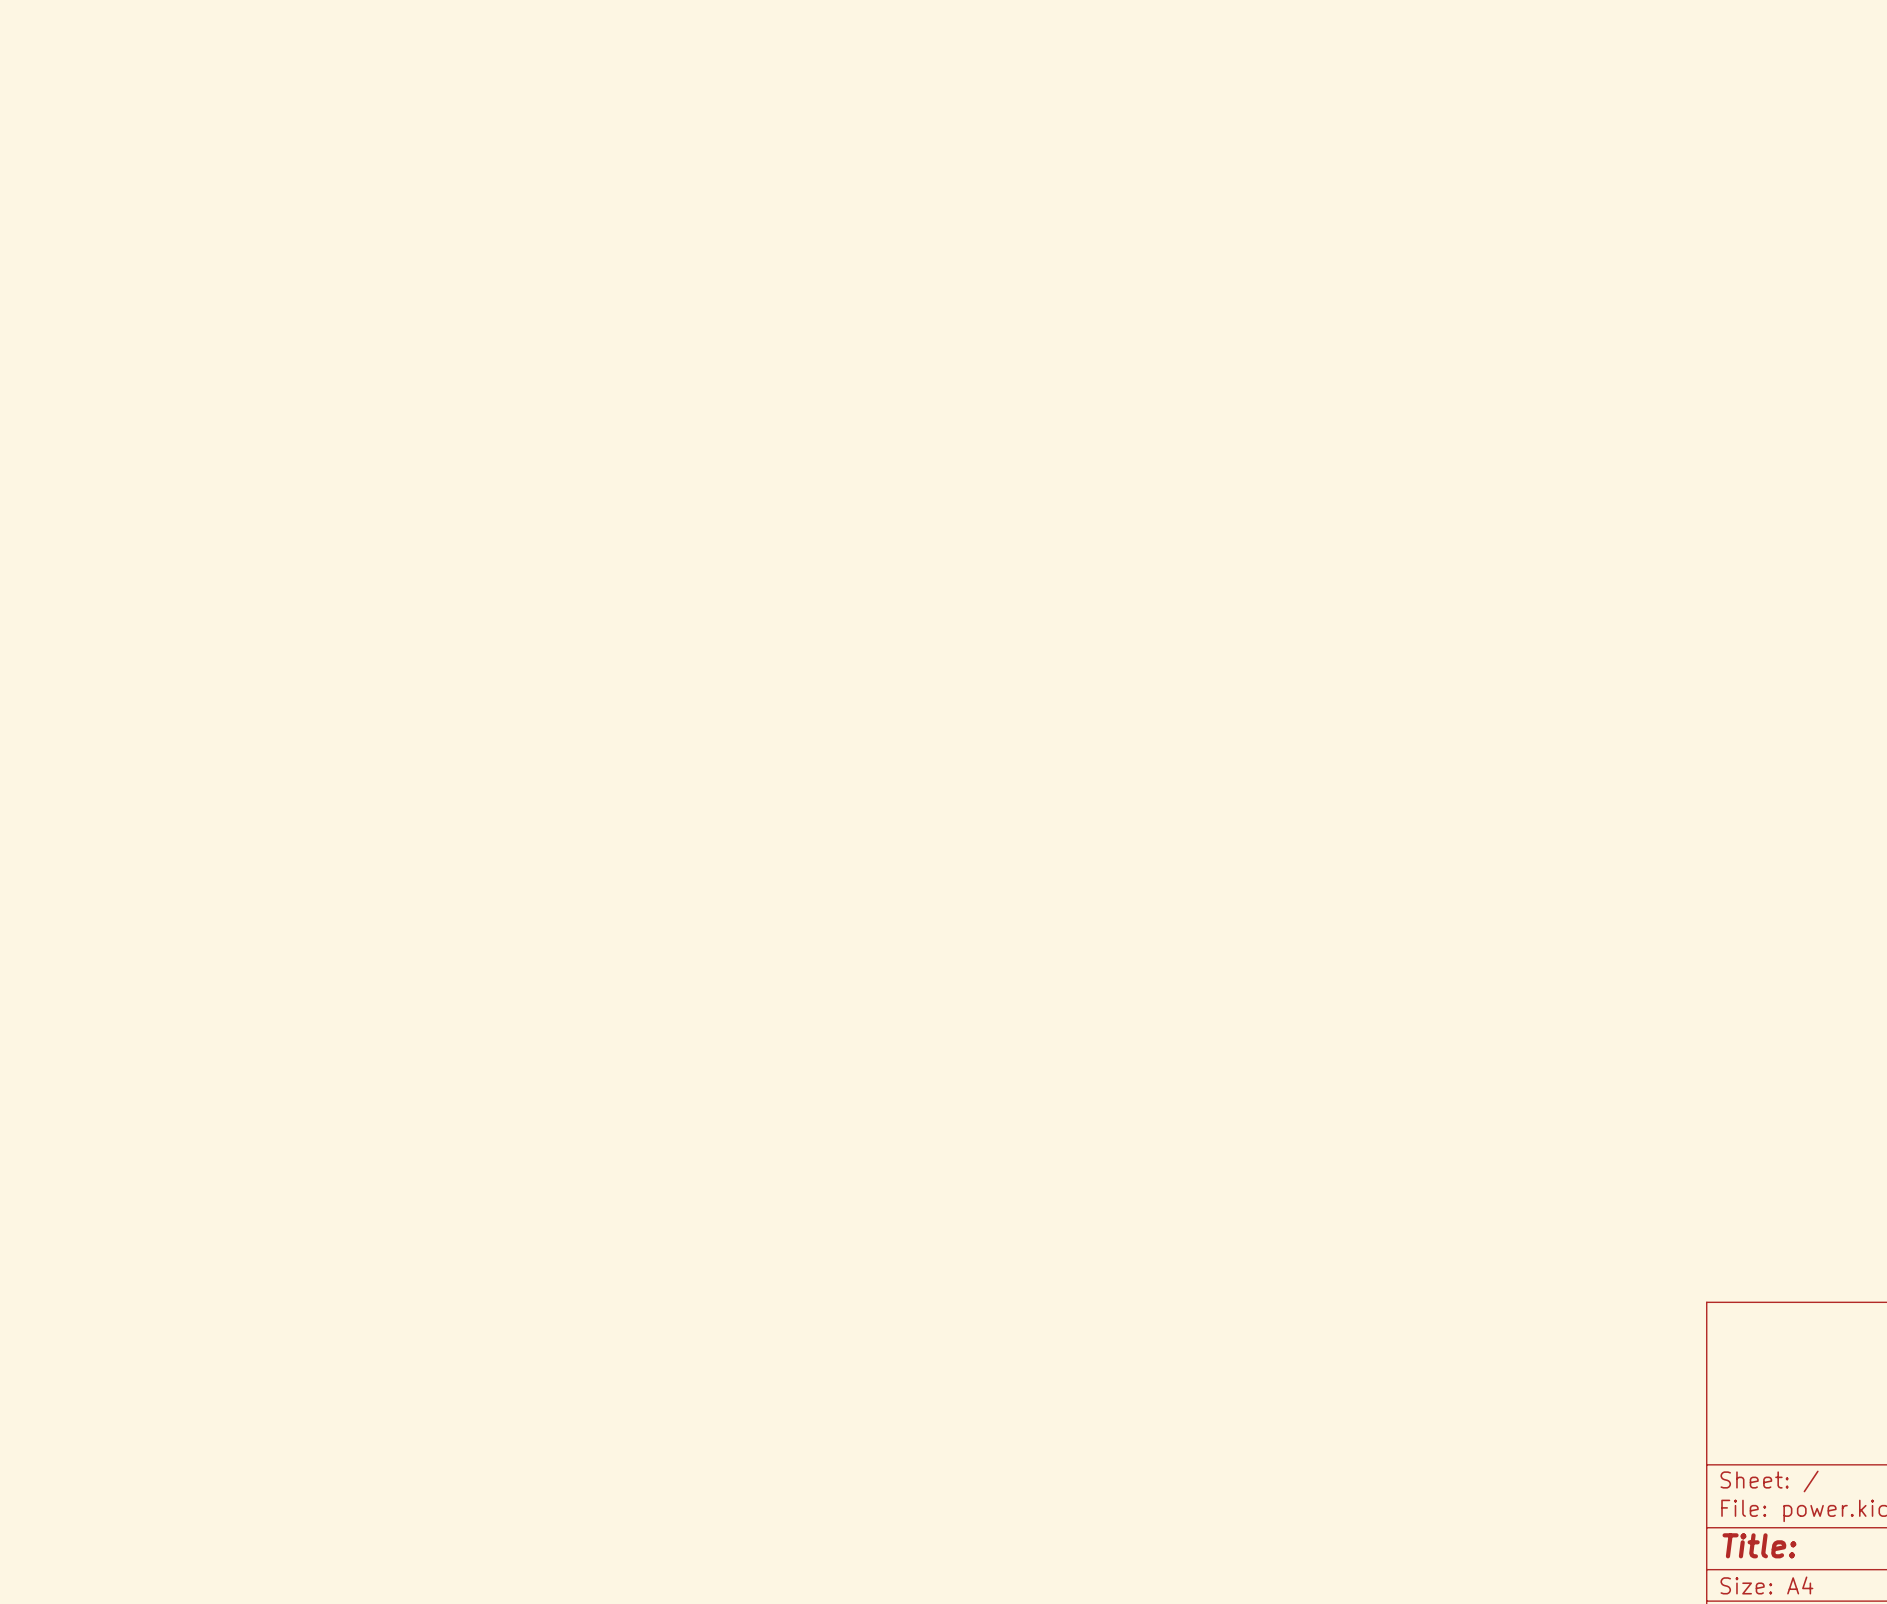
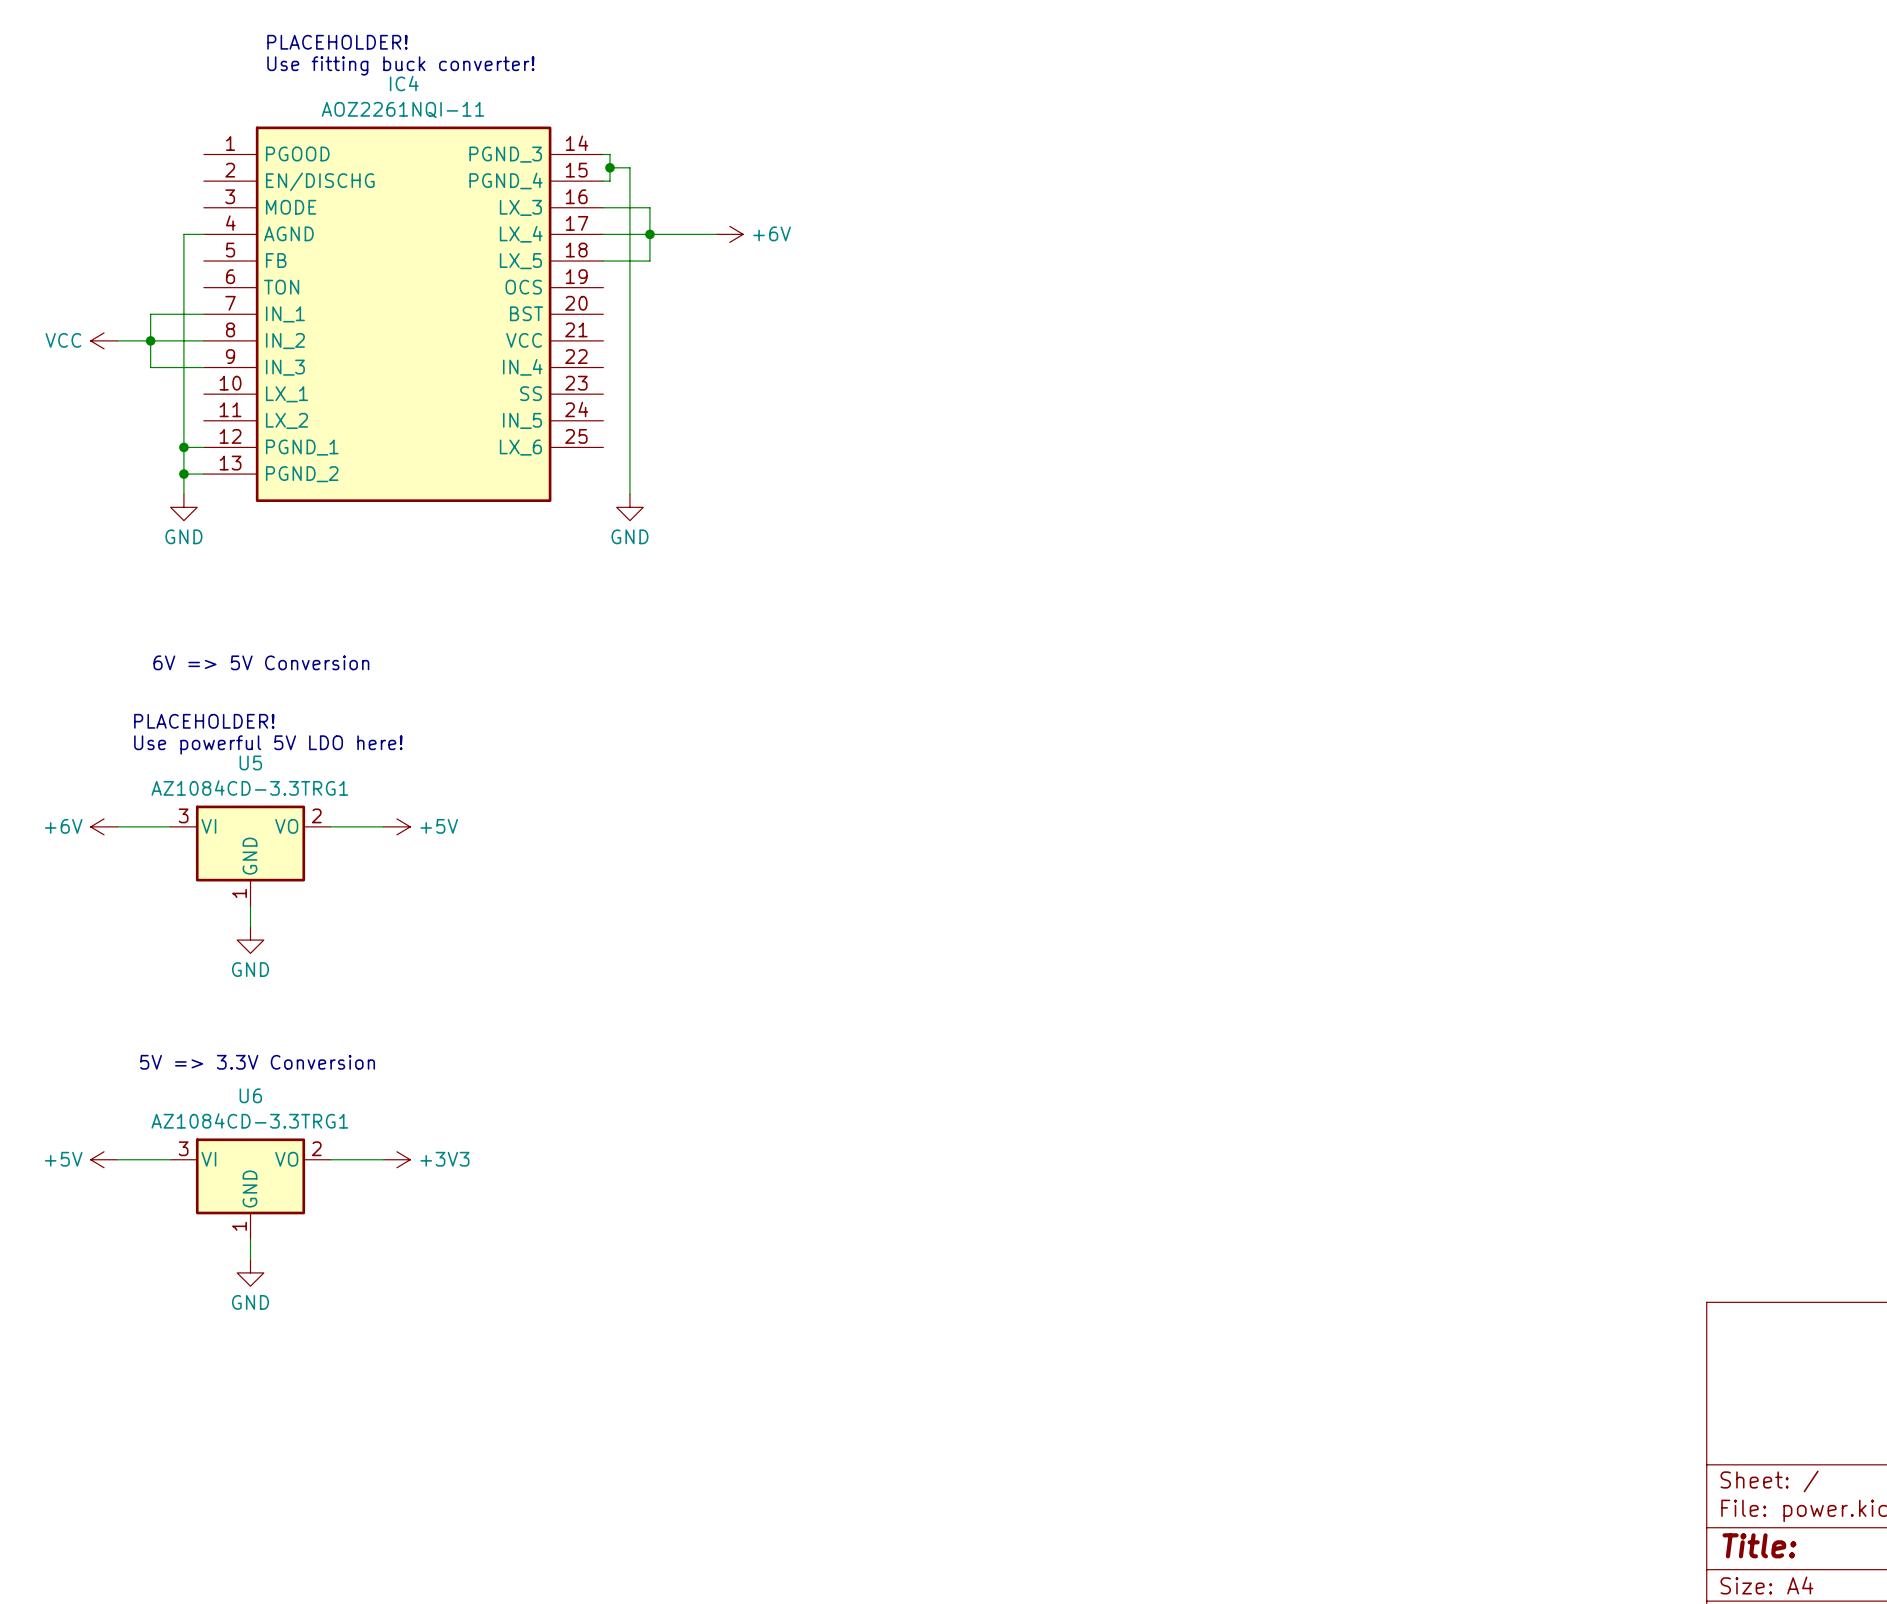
text: none -> PLACEHOLDER! (337, 42)
text: none -> Use fitting buck converter! (400, 65)
wire: none -> (603, 154) (610, 154) (610, 181) (603, 181)
wire: none -> (610, 167) (629, 167) (629, 494)
junction: none -> (610, 167)
wire: none -> (603, 207) (649, 207) (649, 261) (603, 261)
wire: none -> (203, 234) (183, 234) (183, 494)
wire: none -> (603, 234) (716, 234)
junction: none -> (649, 234)
power symbol: none -> +6V (729, 234)
wire: none -> (203, 314) (150, 314) (150, 367) (203, 367)
IC4: none -> AOZ2261NQI-11 (403, 314)
power symbol: none -> VCC (104, 340)
wire: none -> (117, 340) (203, 340)
junction: none -> (150, 340)
wire: none -> (183, 447) (203, 447)
junction: none -> (183, 447)
wire: none -> (183, 474) (203, 474)
junction: none -> (183, 474)
power symbol: none -> GND (183, 507)
power symbol: none -> GND (629, 507)
text: none -> 6V => 5V Conversion (261, 662)
text: none -> PLACEHOLDER! (204, 721)
text: none -> Use powerful 5V LDO here! (268, 744)
power symbol: none -> +6V (104, 826)
wire: none -> (117, 826) (170, 826)
wire: none -> (330, 826) (383, 826)
power symbol: none -> +5V (396, 826)
U5: none -> AZ1084CD-3.3TRG1 (250, 856)
wire: none -> (250, 906) (250, 926)
power symbol: none -> GND (250, 940)
text: none -> 5V => 3.3V Conversion (257, 1062)
power symbol: none -> +5V (104, 1159)
wire: none -> (117, 1159) (170, 1159)
wire: none -> (330, 1159) (383, 1159)
power symbol: none -> +3V3 (396, 1159)
U6: none -> AZ1084CD-3.3TRG1 (250, 1189)
wire: none -> (250, 1239) (250, 1259)
power symbol: none -> GND (250, 1272)

